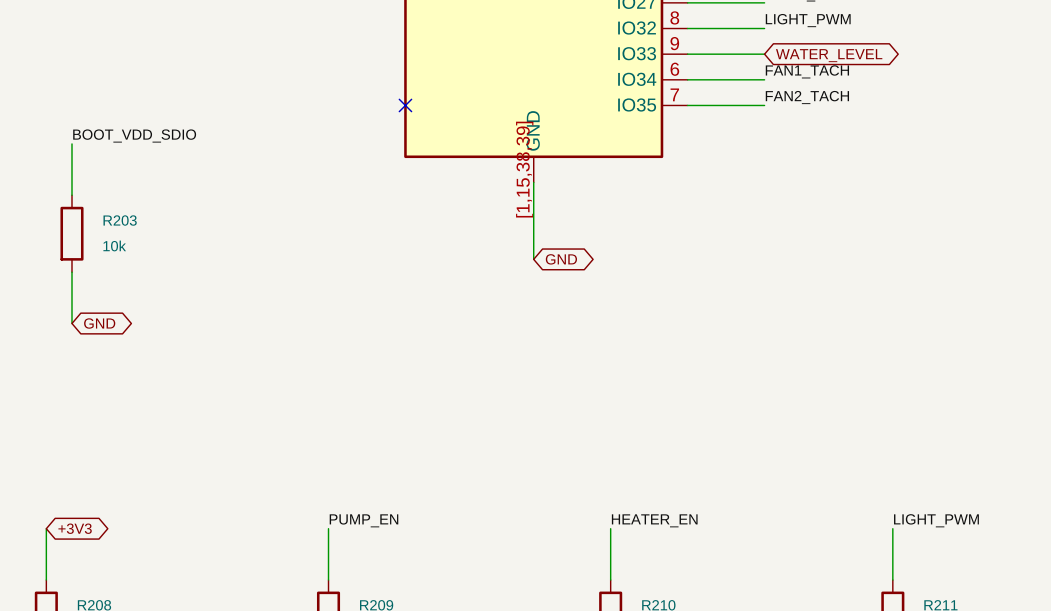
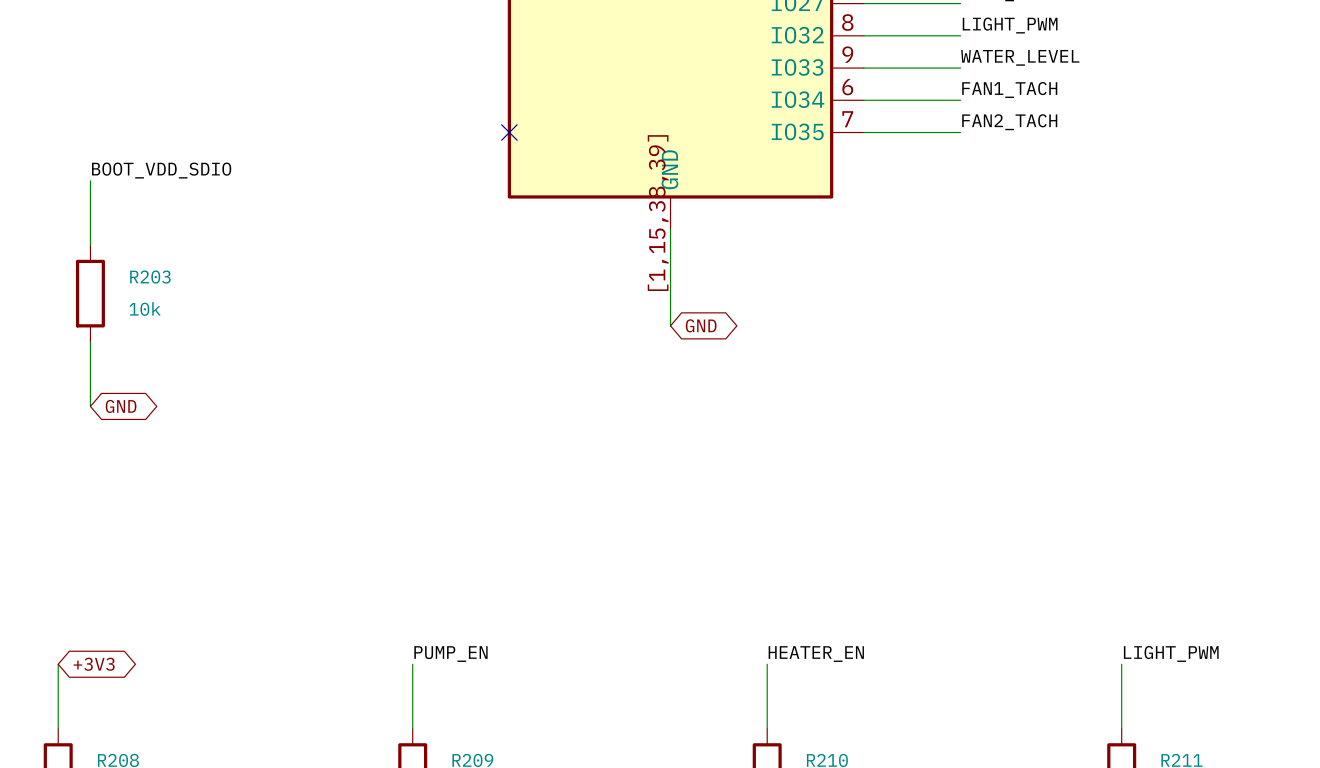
label: none -> WATER_LEVEL (1020, 57)
global label: WATER_LEVEL (829, 55) -> none

